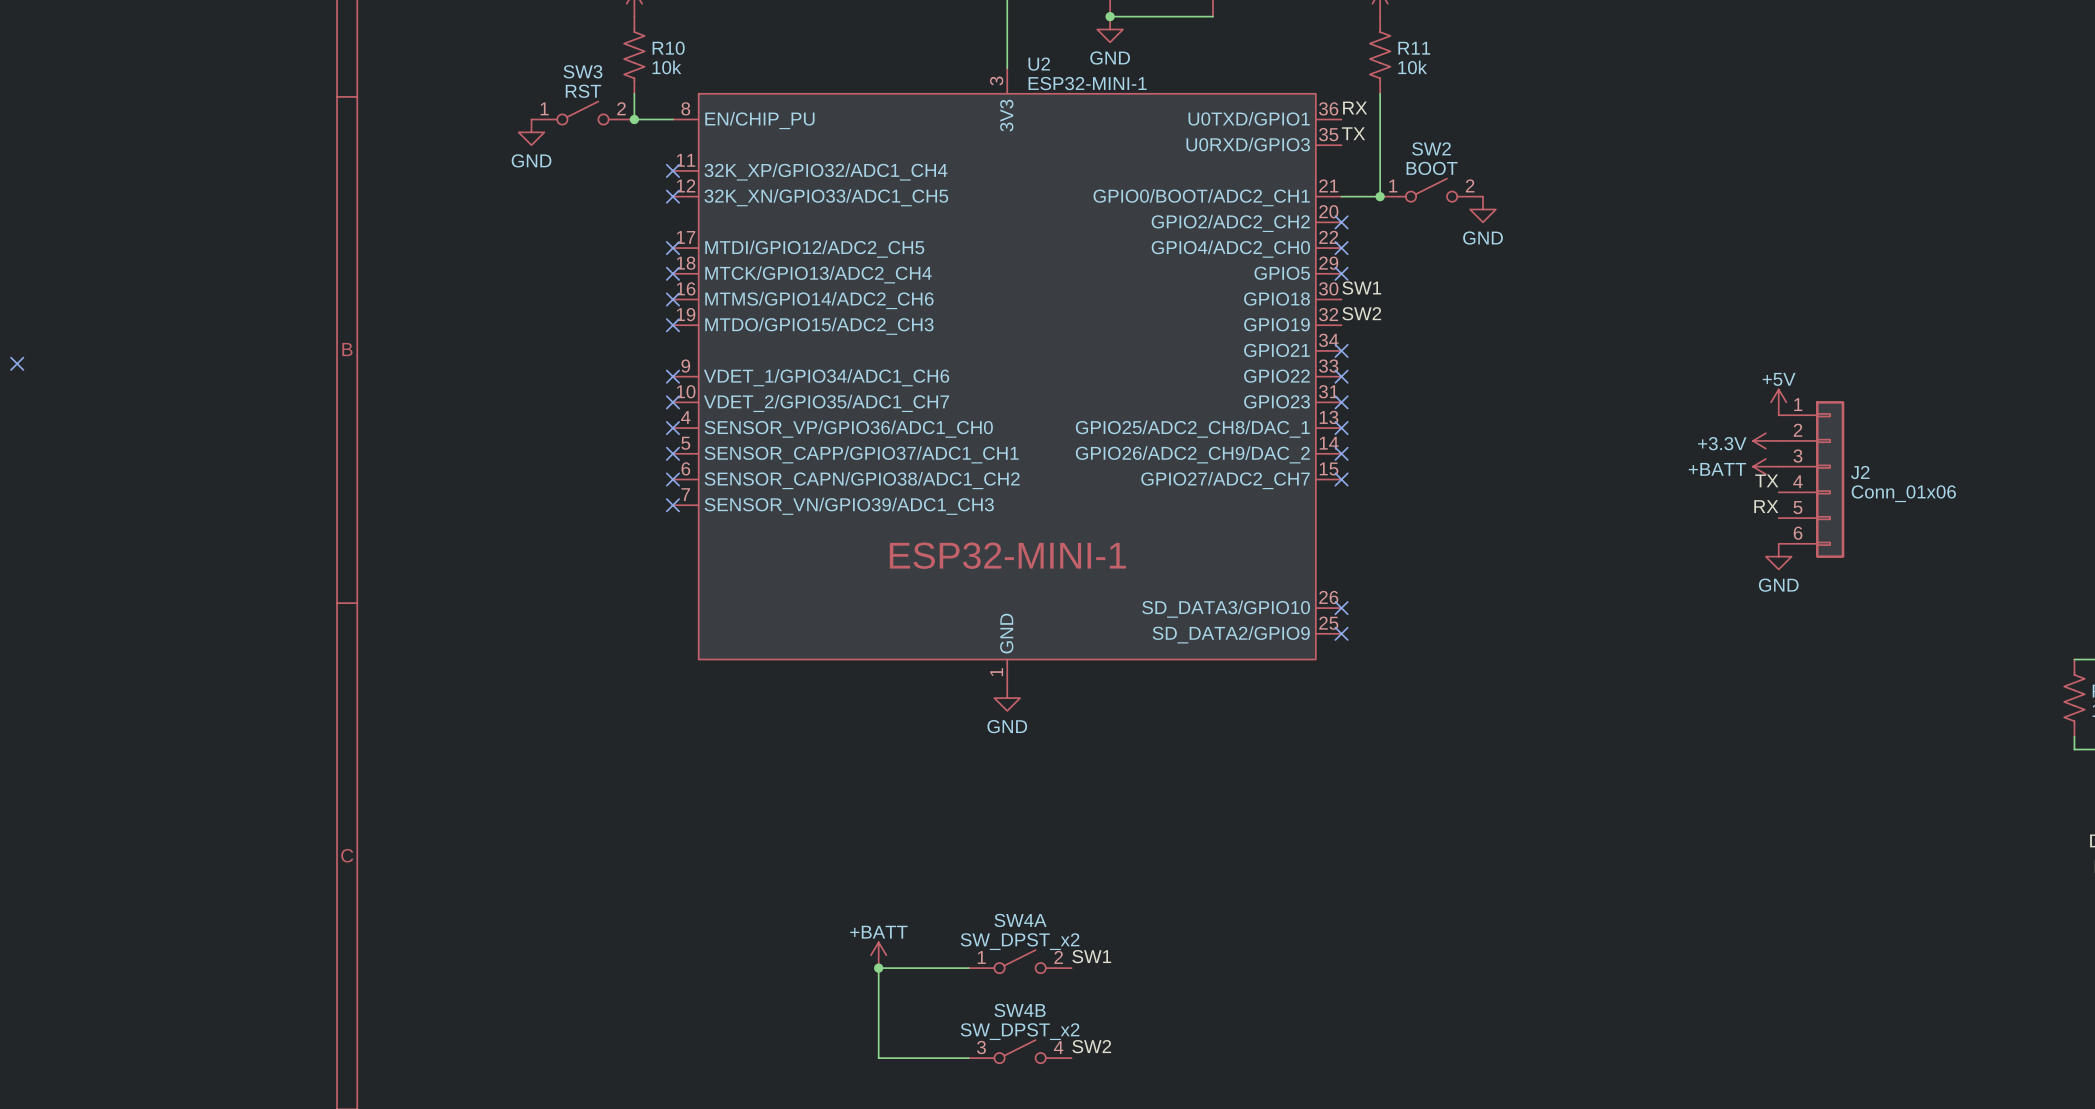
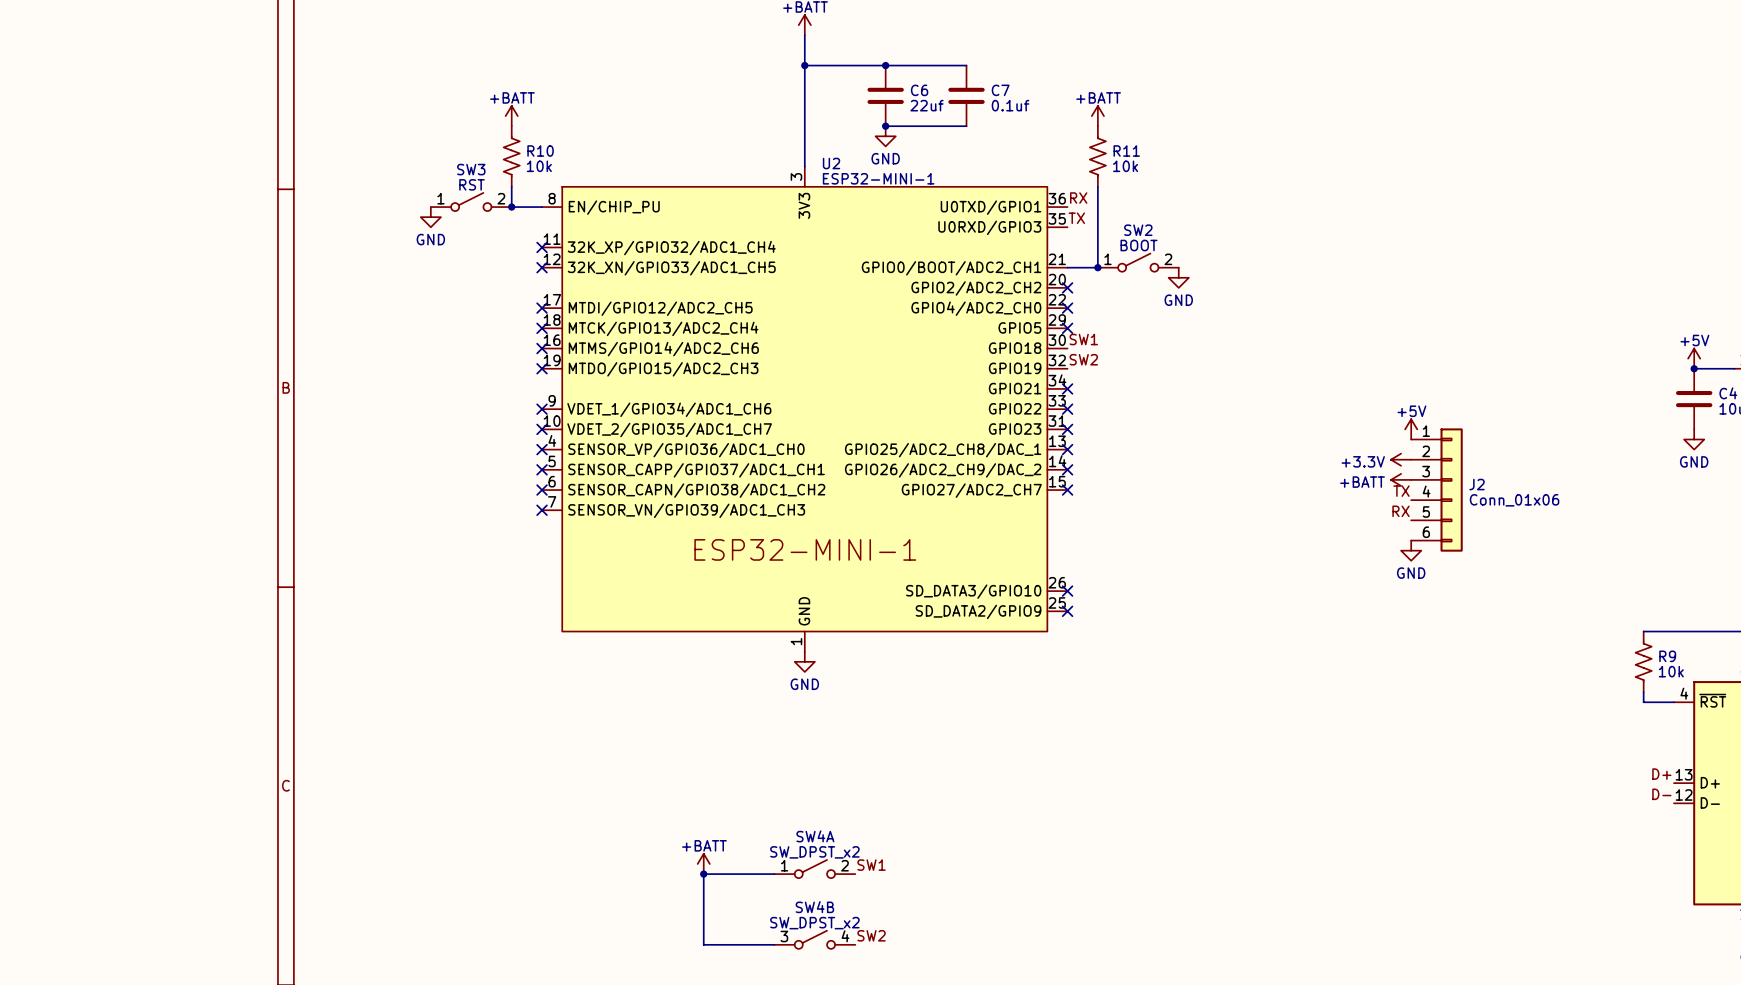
no-connect mark: (17, 363) -> none

